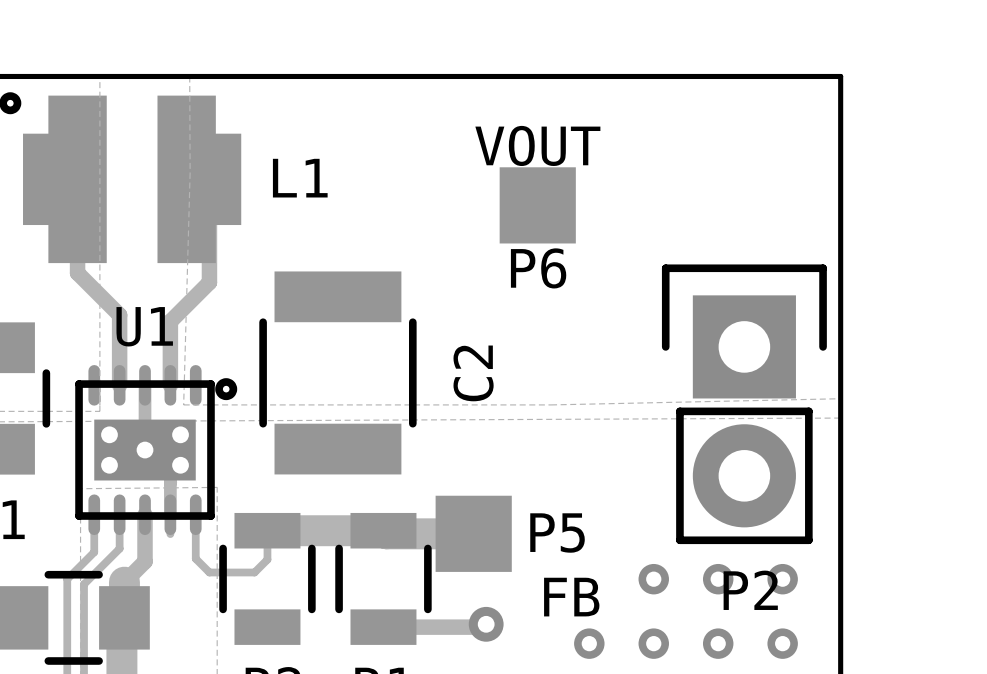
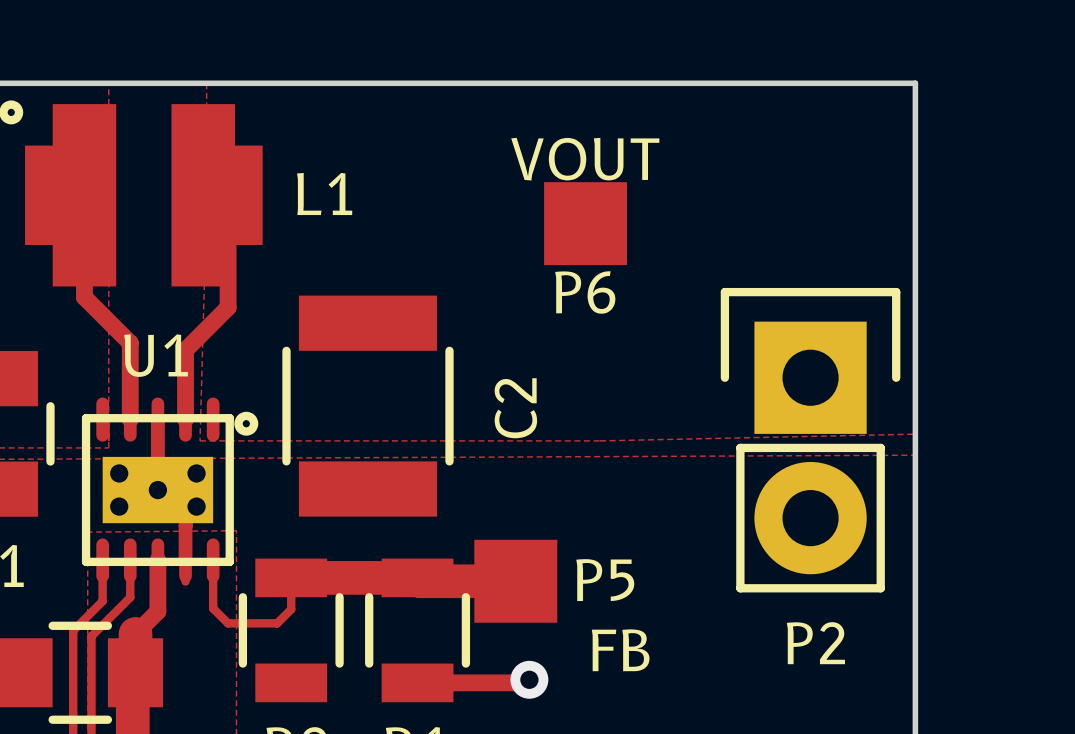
part: (653, 579) -> none
part: (718, 579) -> none
part: (782, 579) -> none
part: (589, 643) -> none
part: (653, 643) -> none
part: (718, 643) -> none
part: (782, 643) -> none

